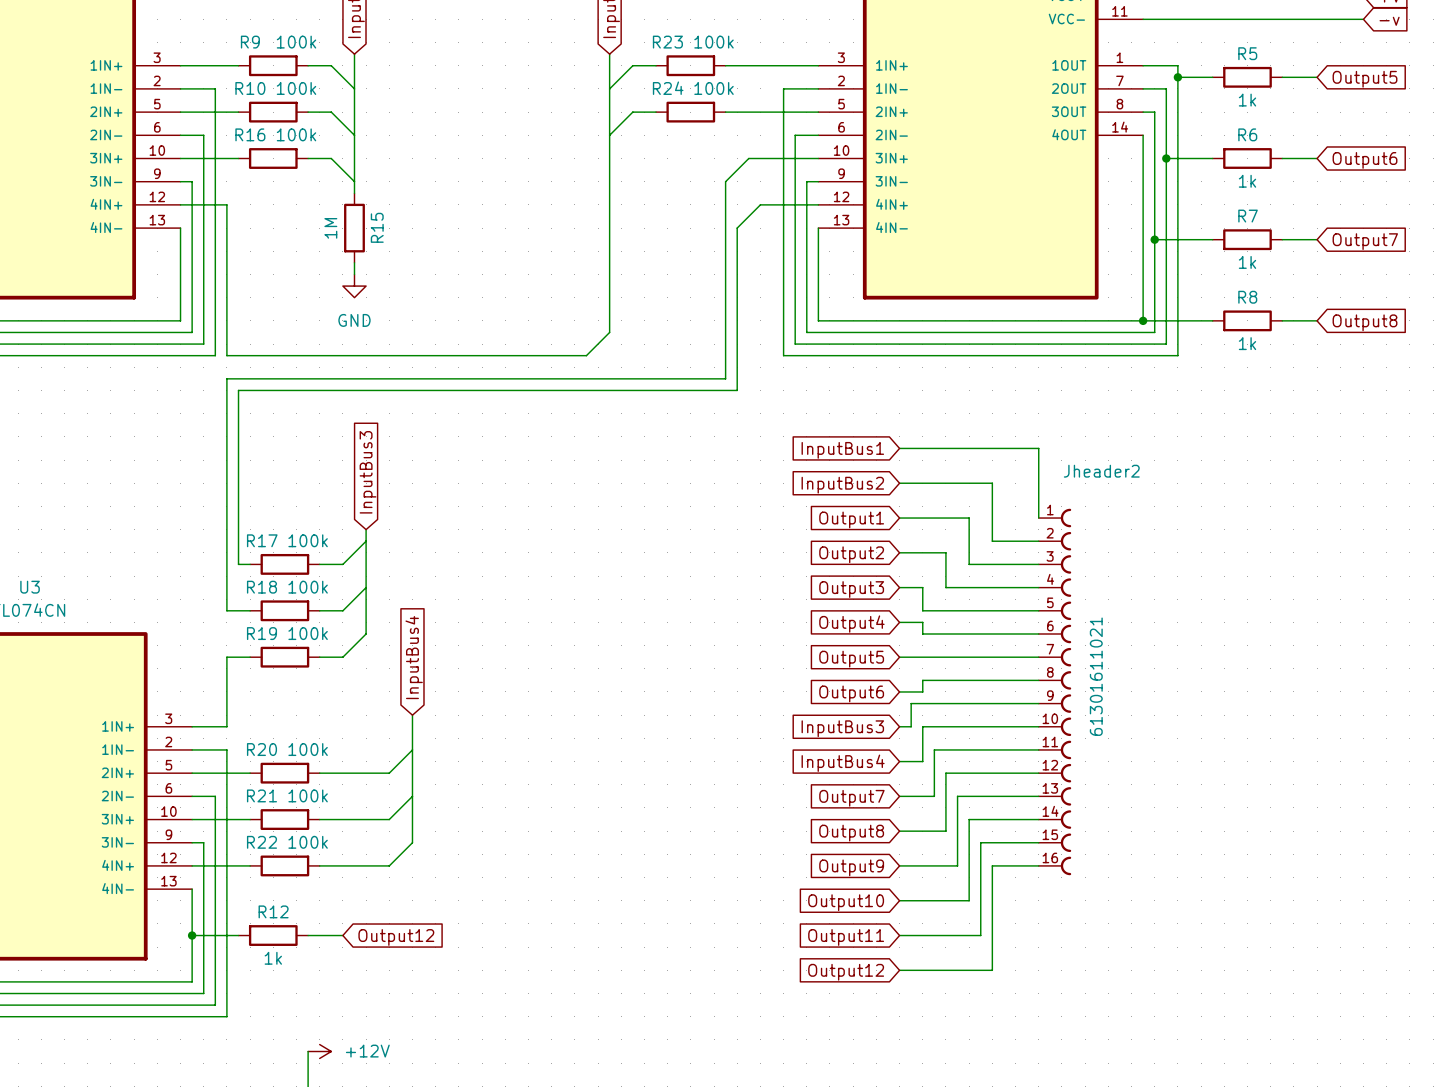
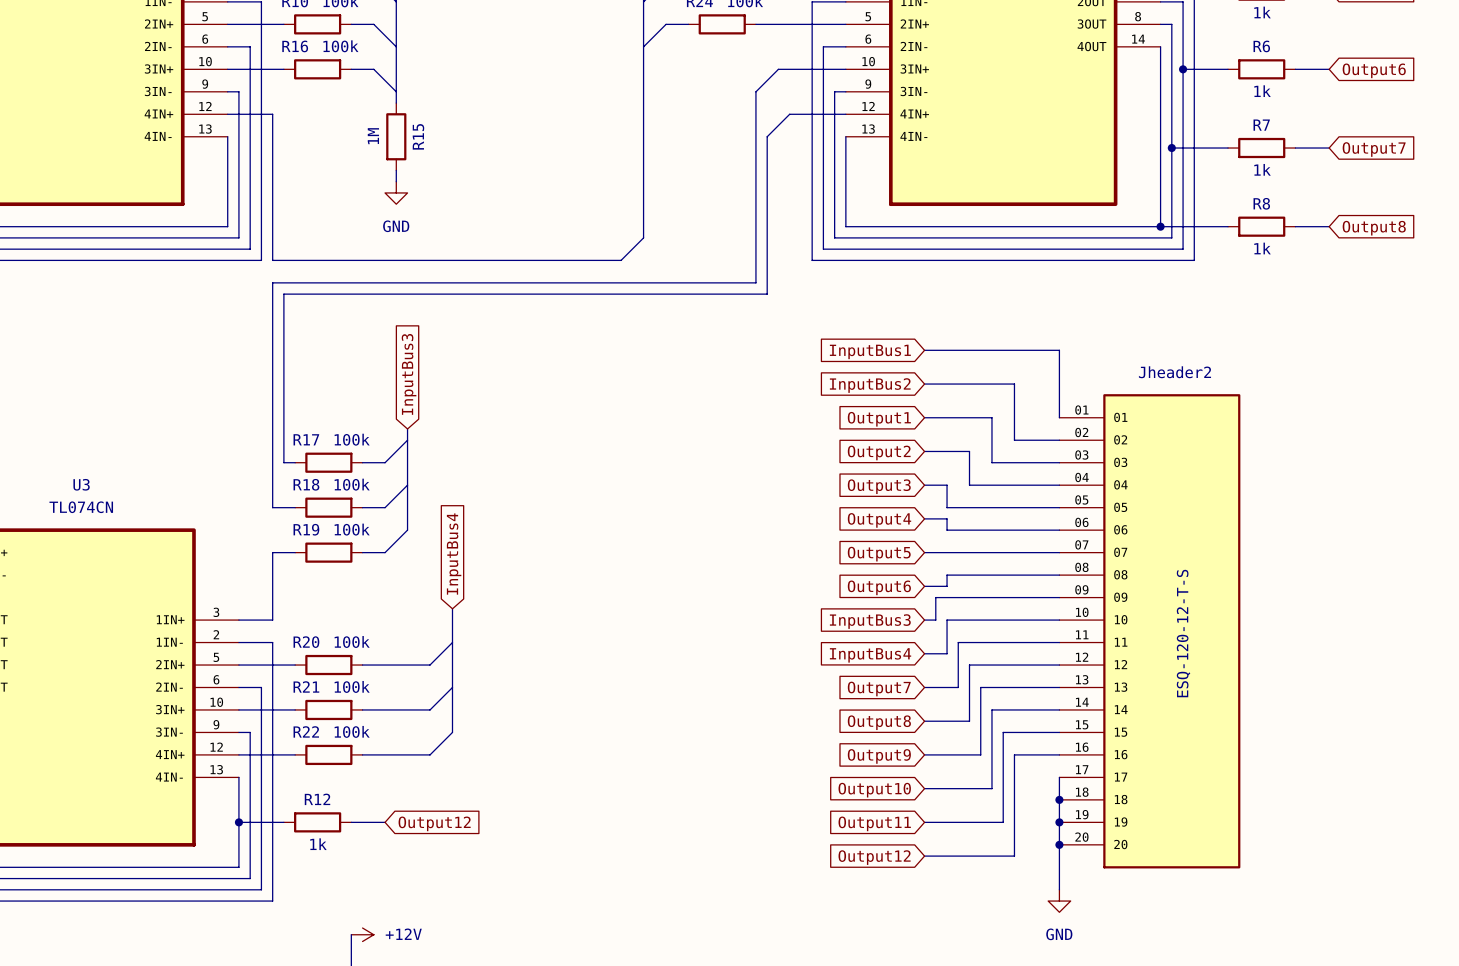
Jheader2 name position: Jheader2 (1101, 471) -> Jheader2 (1174, 372)
Jheader2 symbol: [1038, 508, 1072, 876] -> [1059, 394, 1241, 869]
Jheader2 value: 61301611021 (1096, 676) -> ESQ-120-12-T-S (1183, 633)
wire: none -> (1059, 777) (1059, 889)
junction: none -> (1059, 799)
junction: none -> (1059, 822)
junction: none -> (1059, 844)
power symbol: none -> GND (1059, 901)

